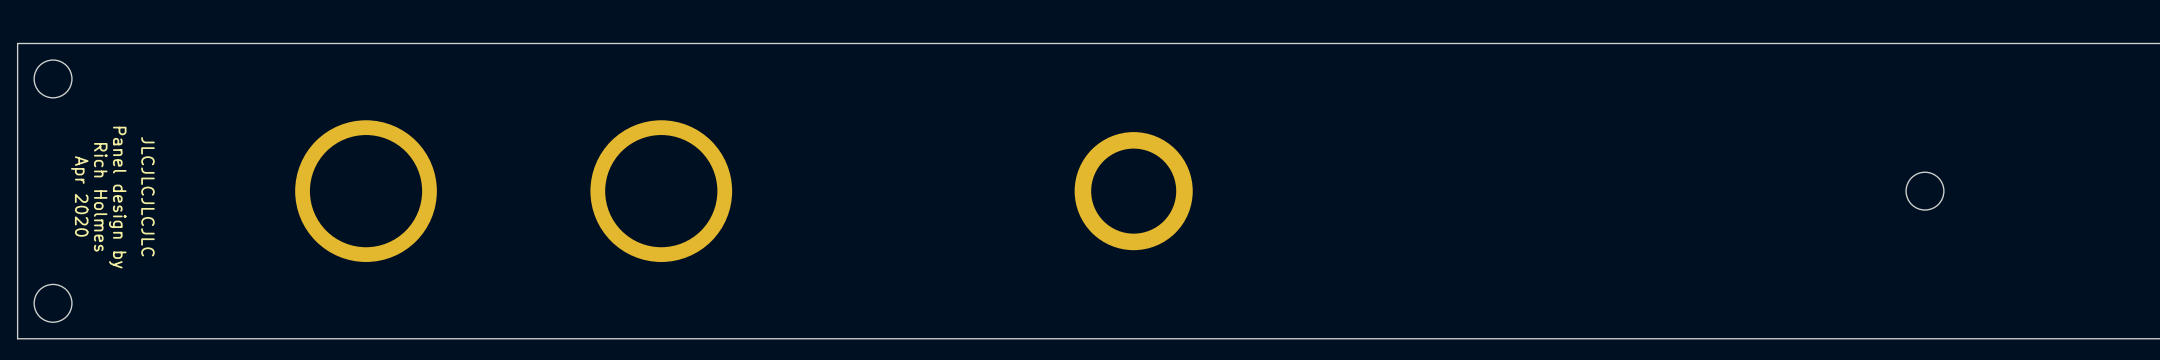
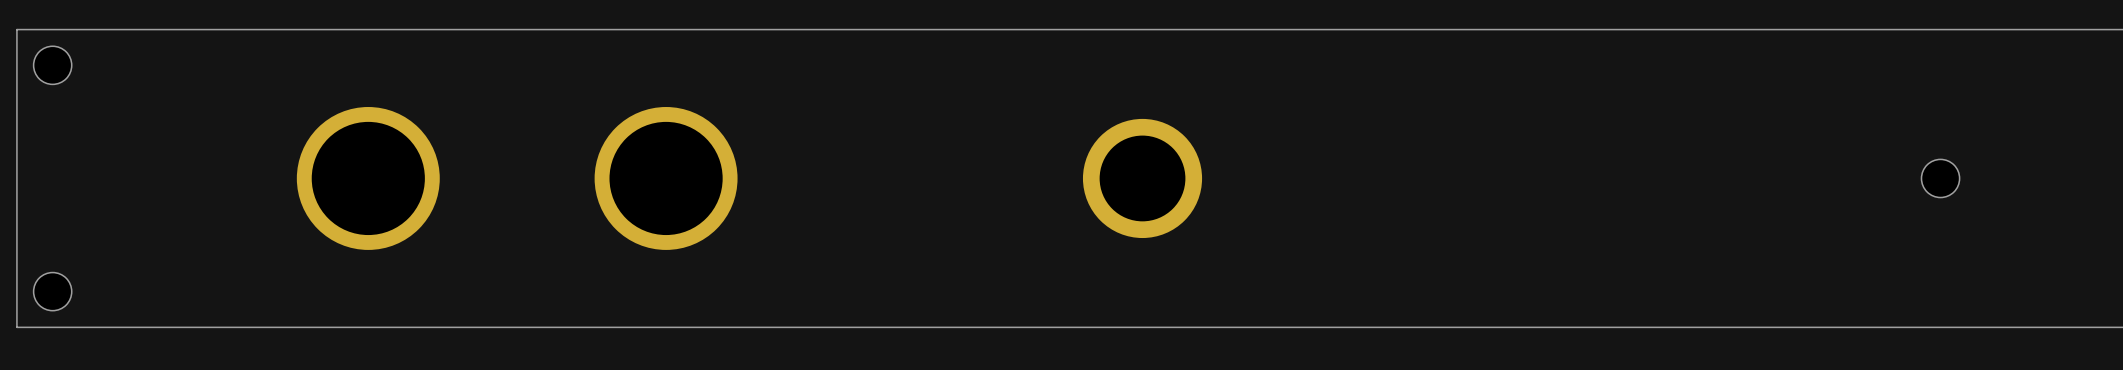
text: Apr 2020 (79, 196) -> none
text: JLCJLCJLCJLC (147, 196) -> none
text: Rich Holmes (100, 197) -> none
text: Panel design by (117, 197) -> none

